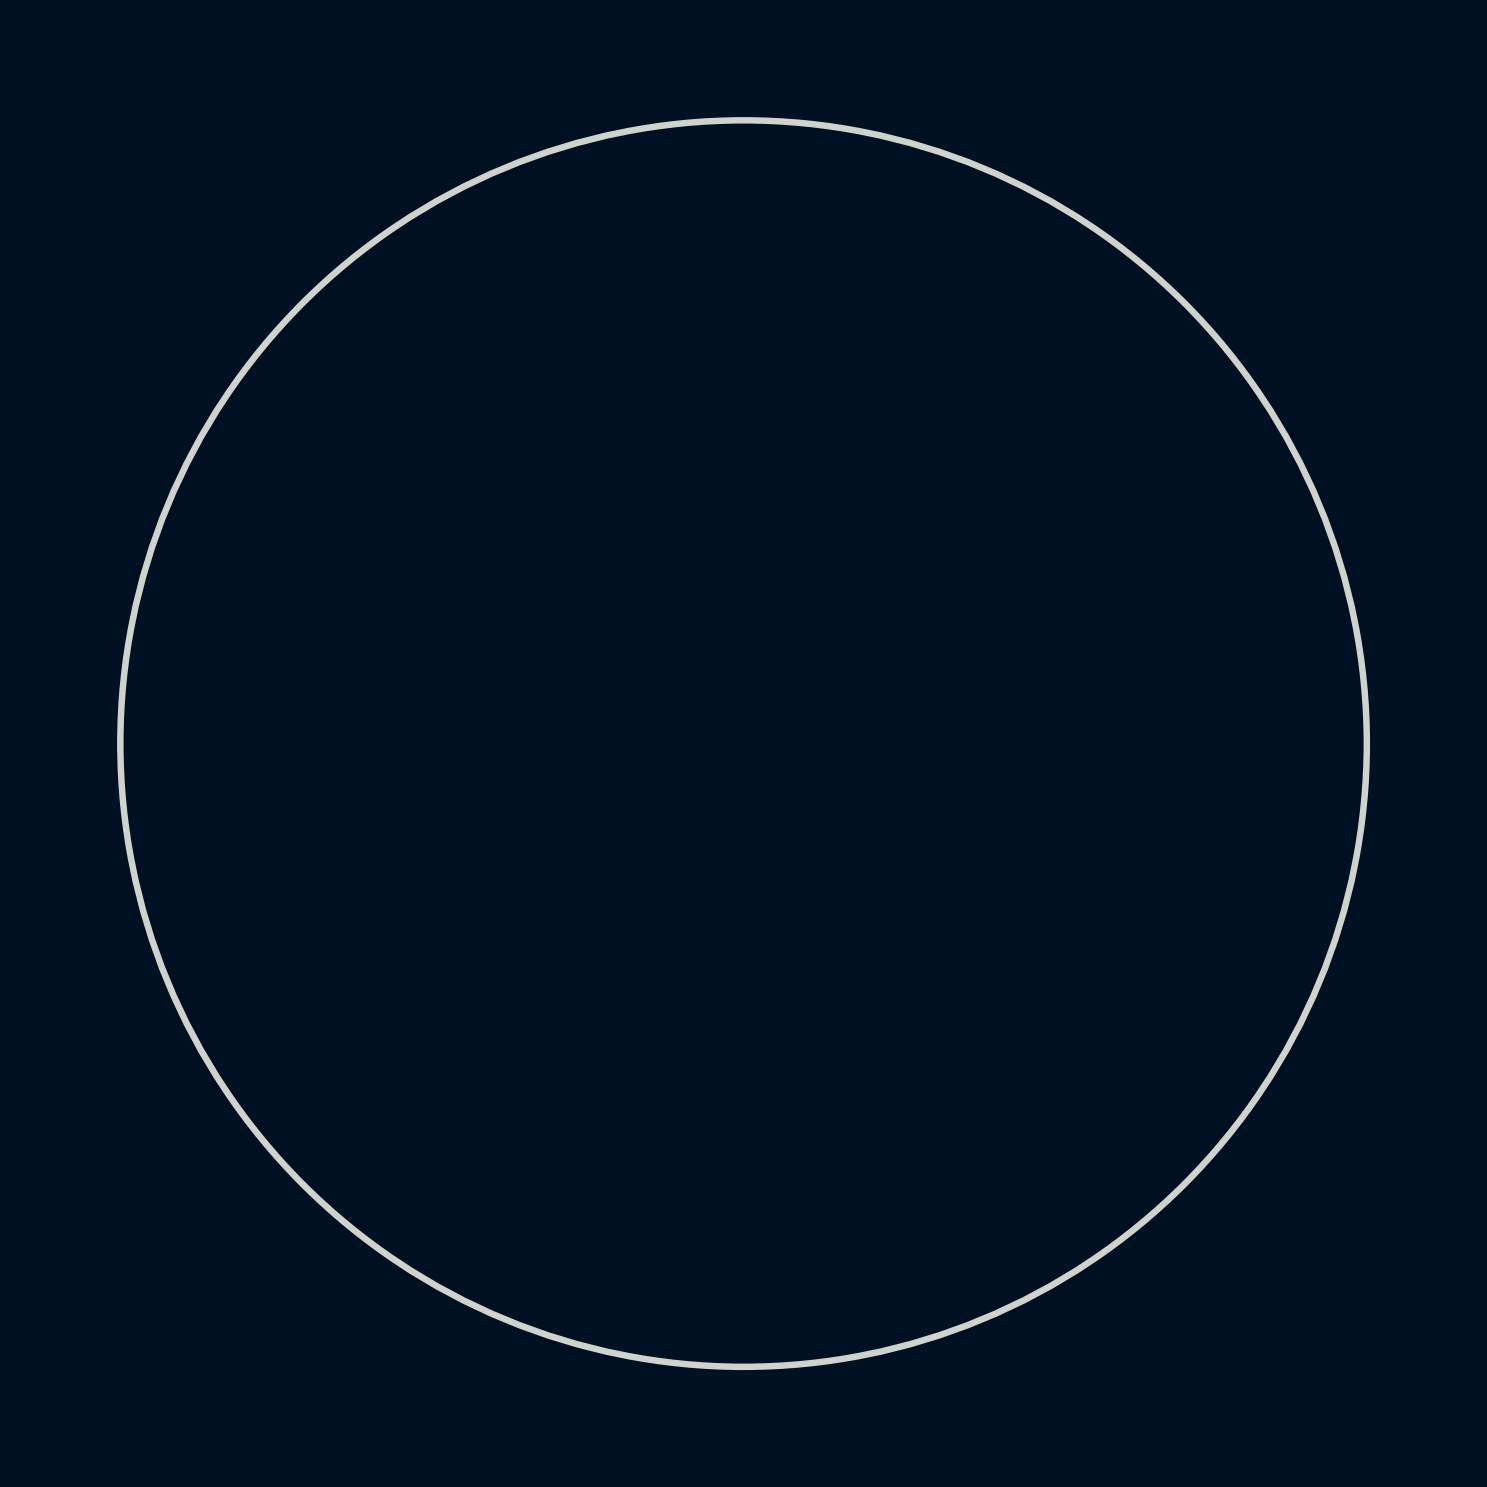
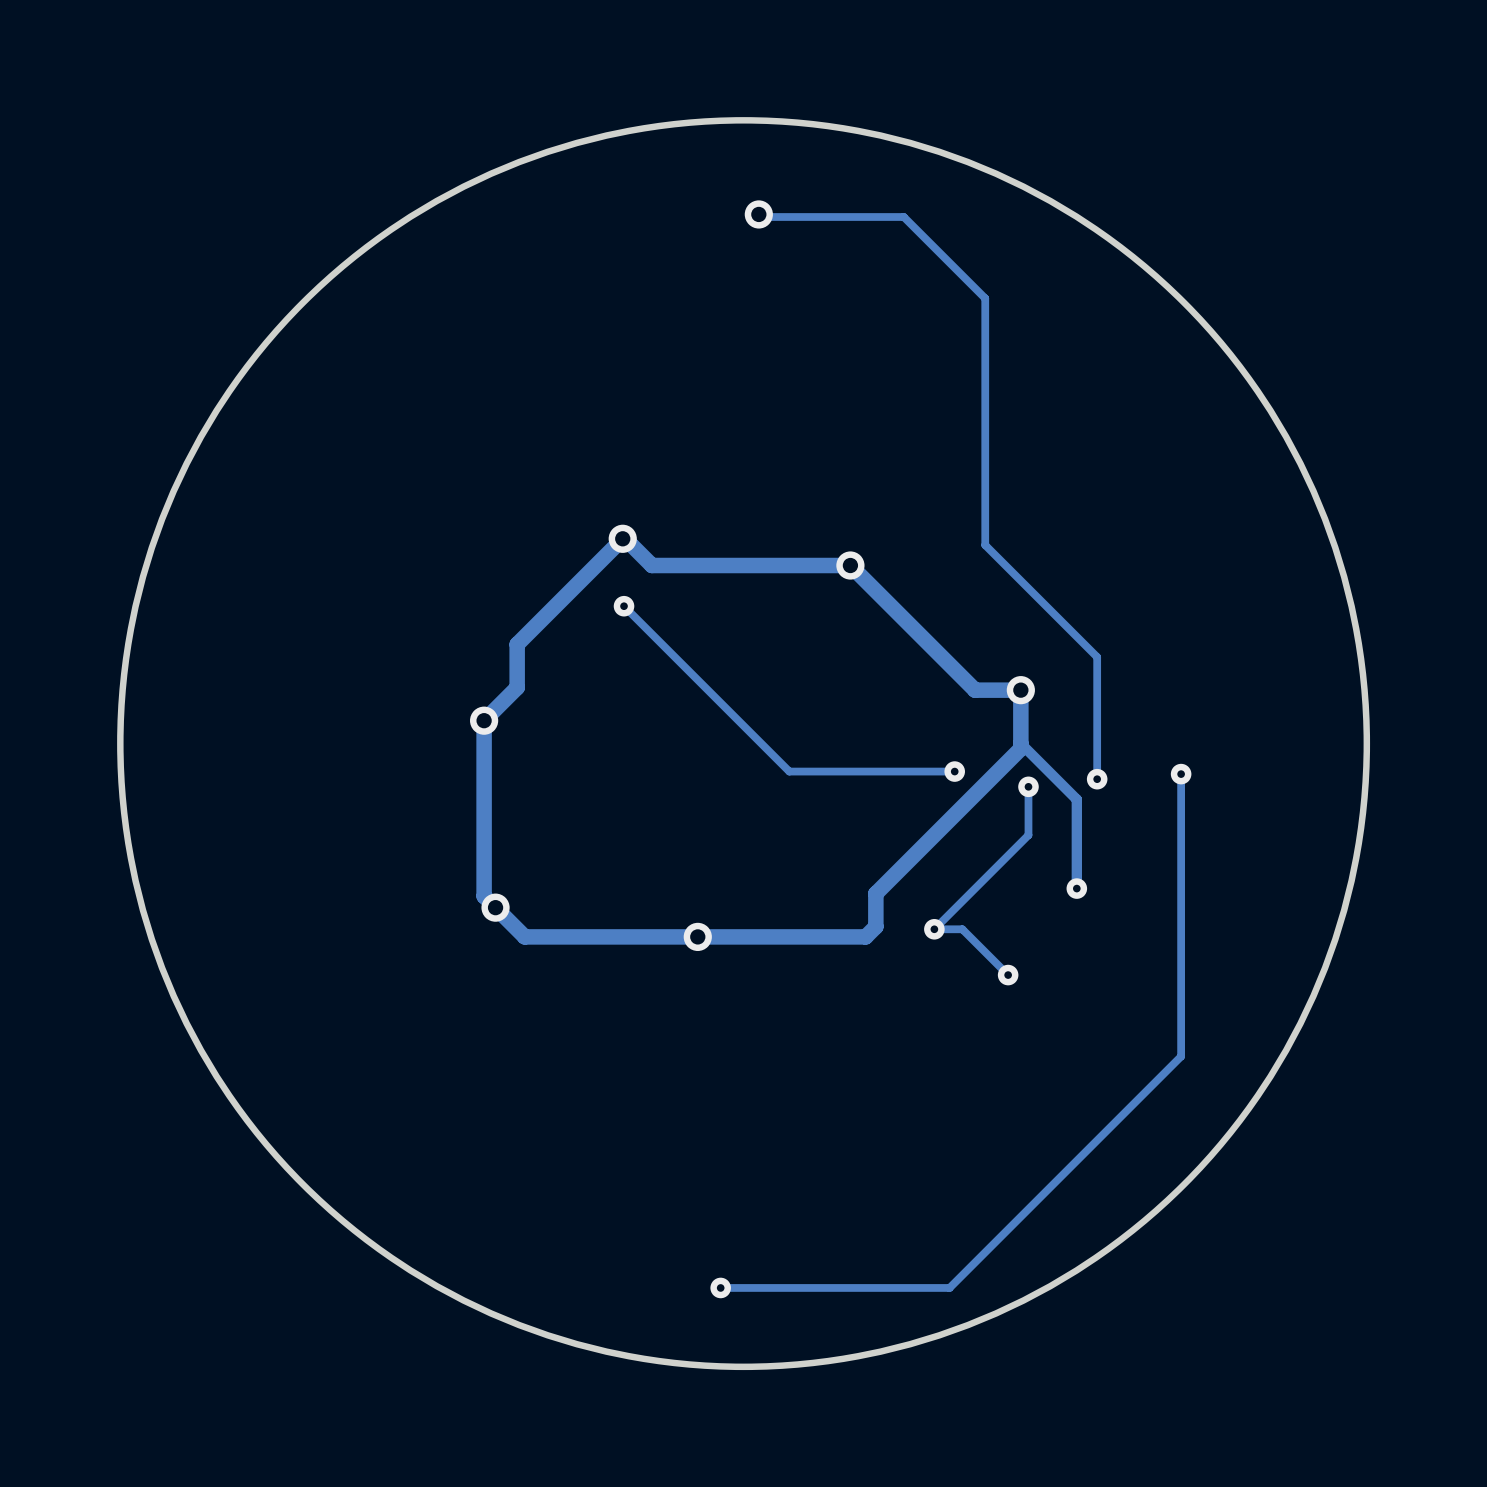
track: none -> (758, 214) (761, 217) (903, 217) (985, 298) (985, 545) (1097, 657) (1097, 779)
via: none -> (758, 214)
track: none -> (624, 537) (517, 644) (517, 687) (484, 720) (484, 896) (524, 936) (865, 936) (875, 926) (875, 893) (1020, 748) (1020, 690) (975, 690) (850, 565) (652, 565) (624, 537)
via: none -> (622, 538)
via: none -> (850, 565)
track: none -> (624, 606) (789, 771) (954, 771)
via: none -> (624, 606)
via: none -> (1020, 690)
via: none -> (484, 720)
track: none -> (1020, 743) (1076, 799) (1076, 888)
via: none -> (954, 771)
track: none -> (1181, 774) (1181, 1056) (949, 1287) (720, 1287)
via: none -> (1181, 774)
via: none -> (1097, 779)
track: none -> (1028, 786) (1028, 835) (934, 929) (962, 929) (1008, 975)
via: none -> (1028, 786)
via: none -> (1076, 888)
via: none -> (495, 907)
via: none -> (934, 929)
via: none -> (697, 936)
via: none -> (1008, 975)
via: none -> (720, 1287)

